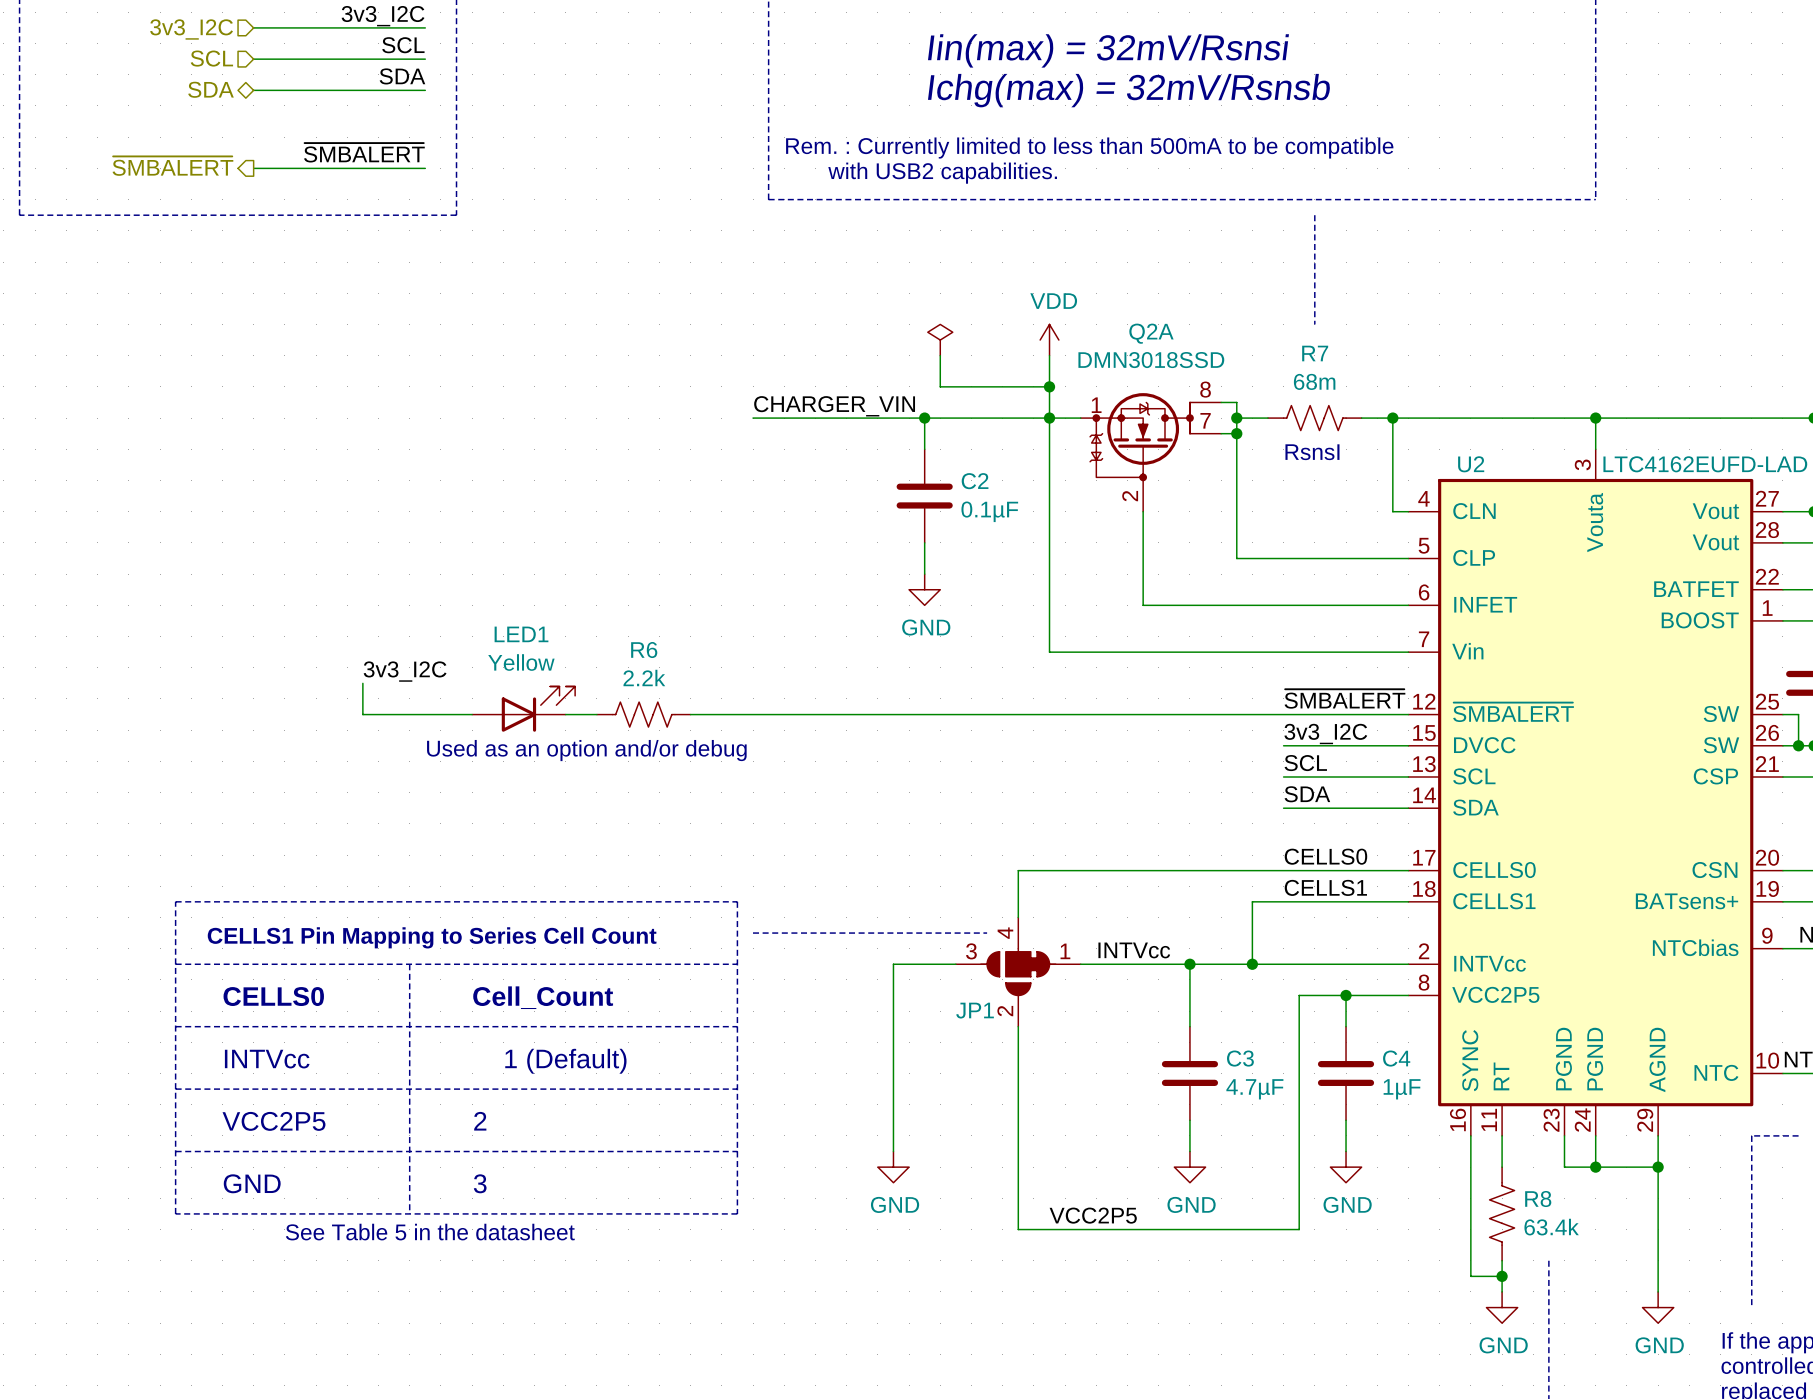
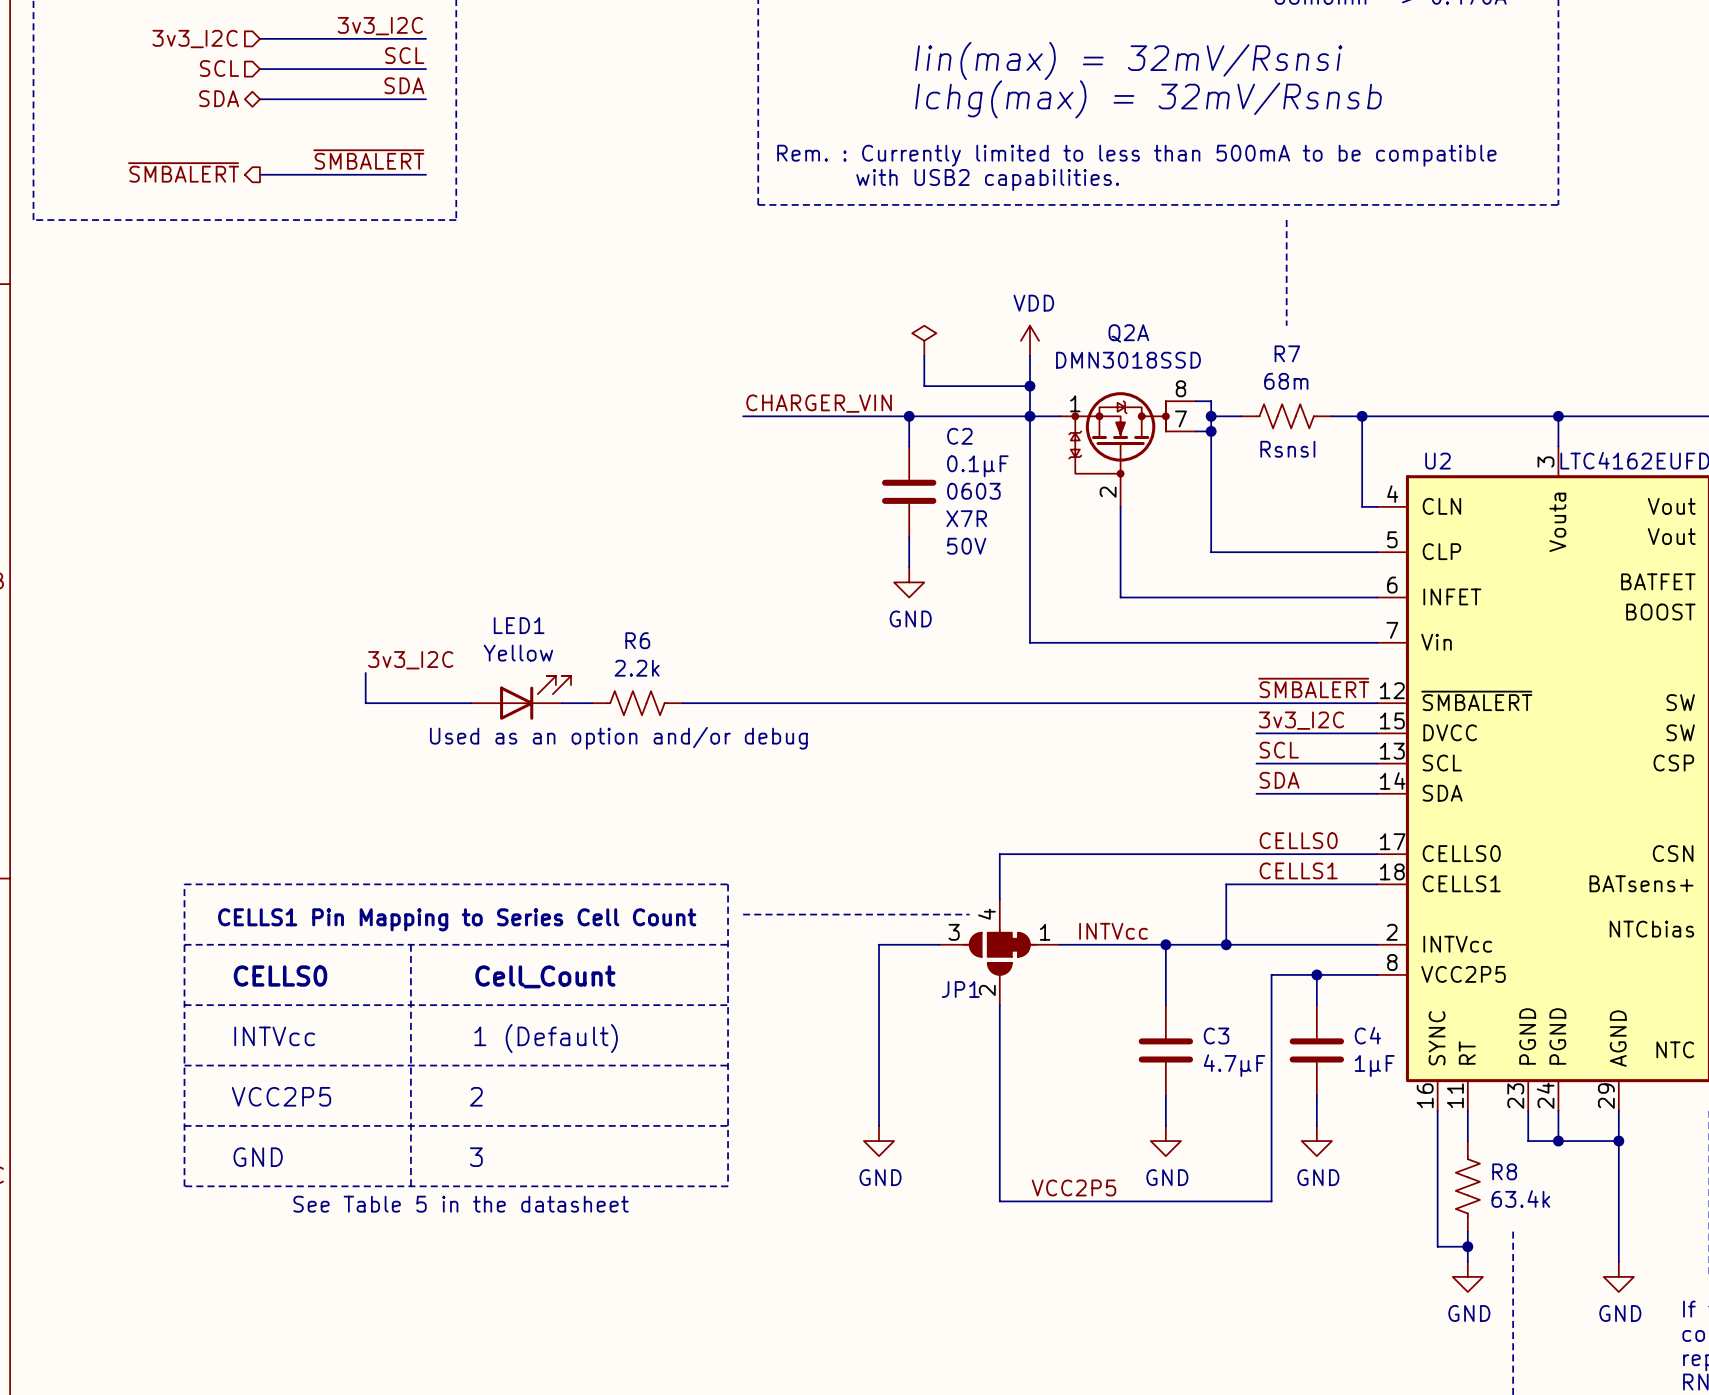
C2 text: none -> 0.1µF (977, 466)
C2 name position: C2 (975, 481) -> C2 (959, 436)
C2 text: none -> 0603 (973, 491)
C2 value: 0.1µF (989, 511) -> none
C2 text: none -> X7R (966, 518)
C2 text: none -> 50V (966, 546)

